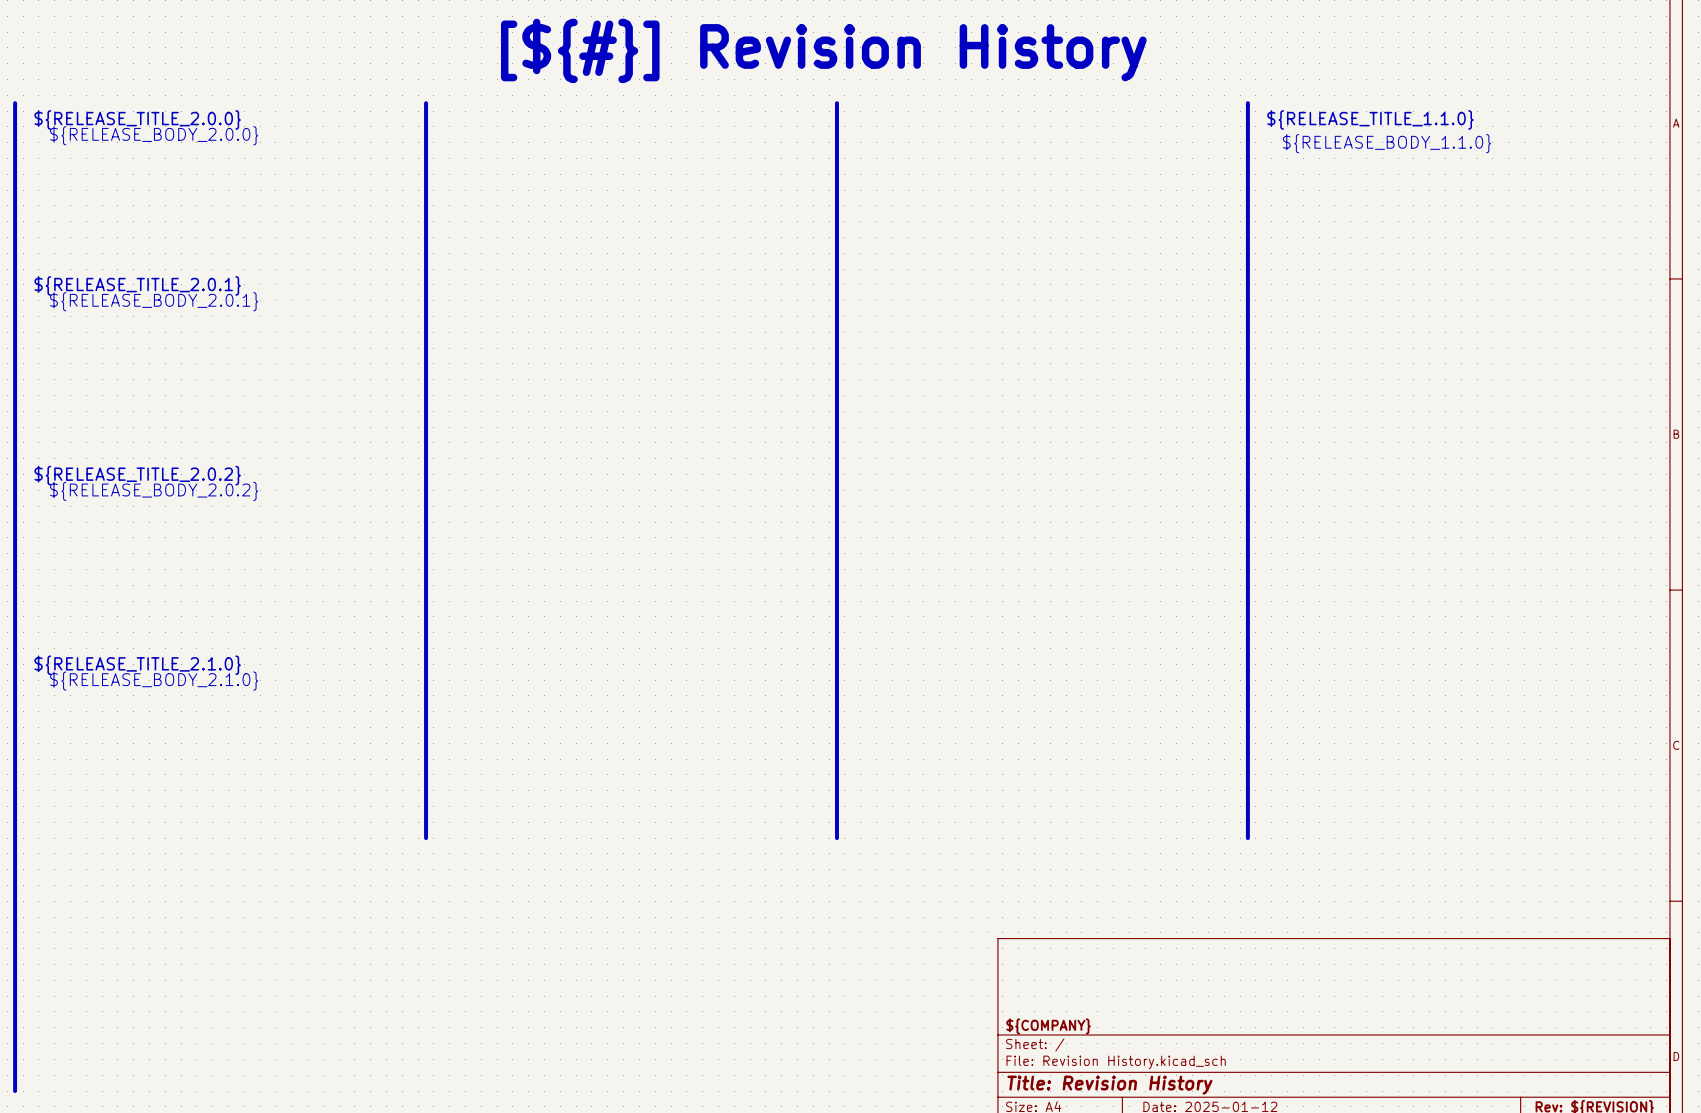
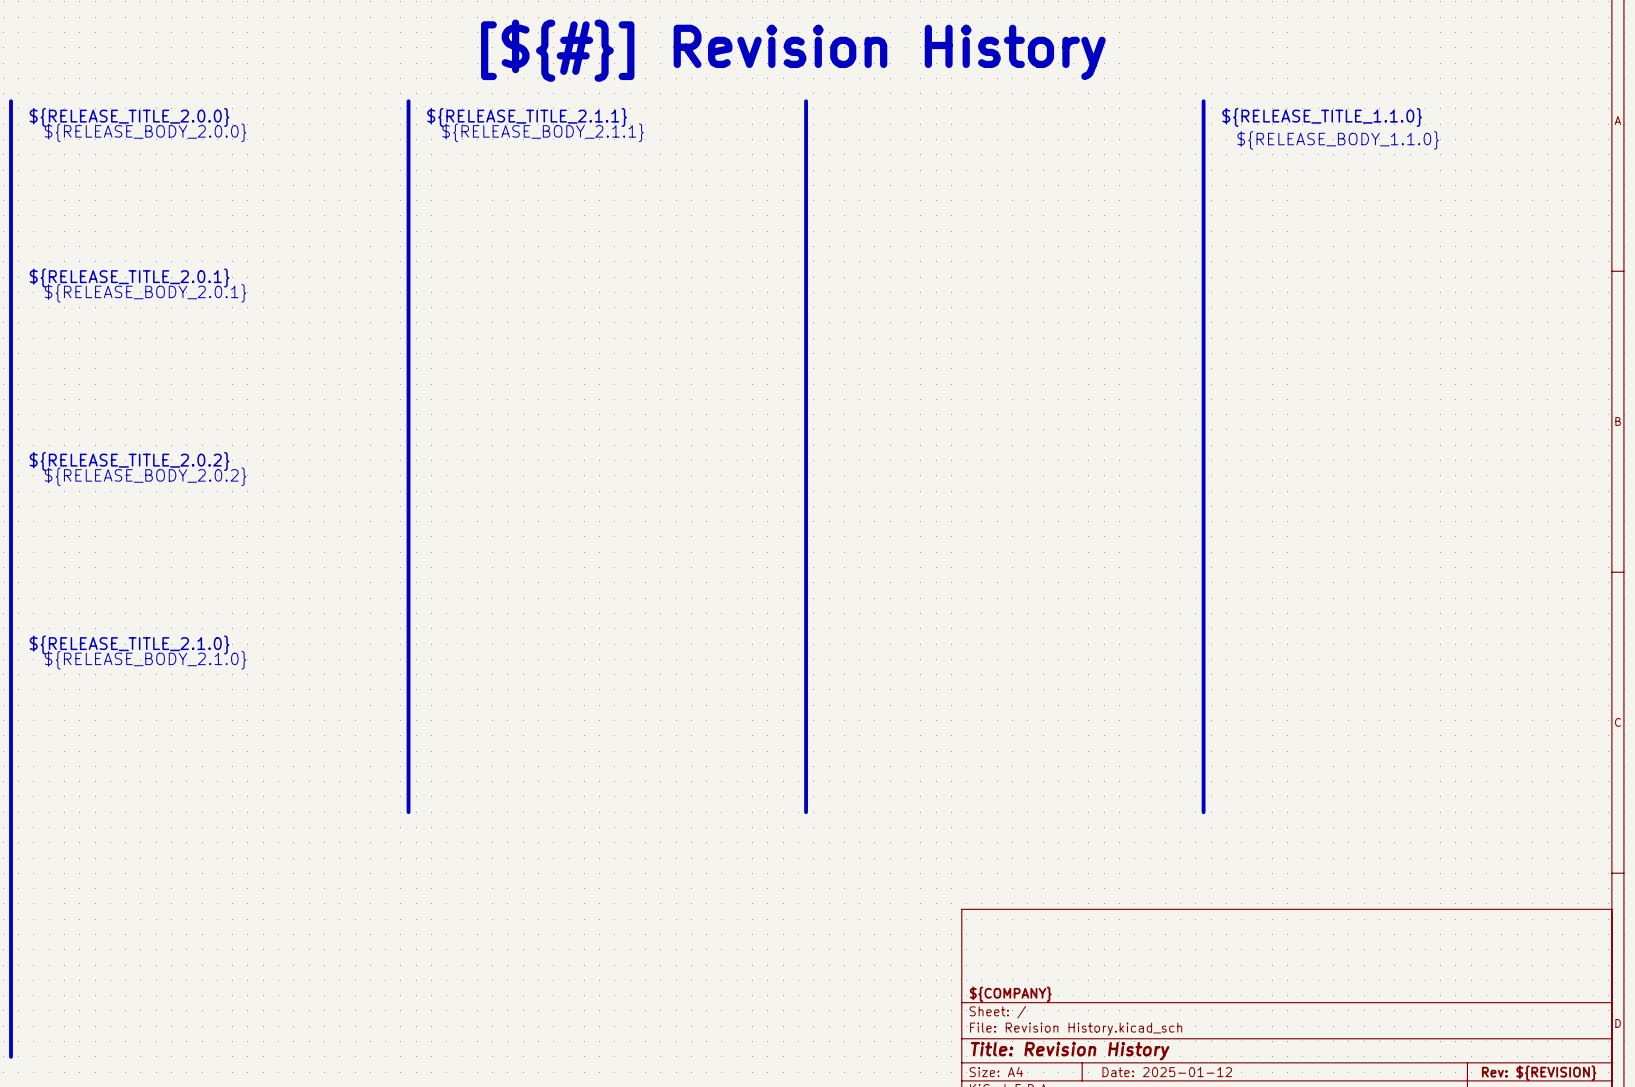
text: none -> ${RELEASE_TITLE_2.1.1} (527, 117)
text: none -> ${RELEASE_BODY_2.1.1} (543, 132)

